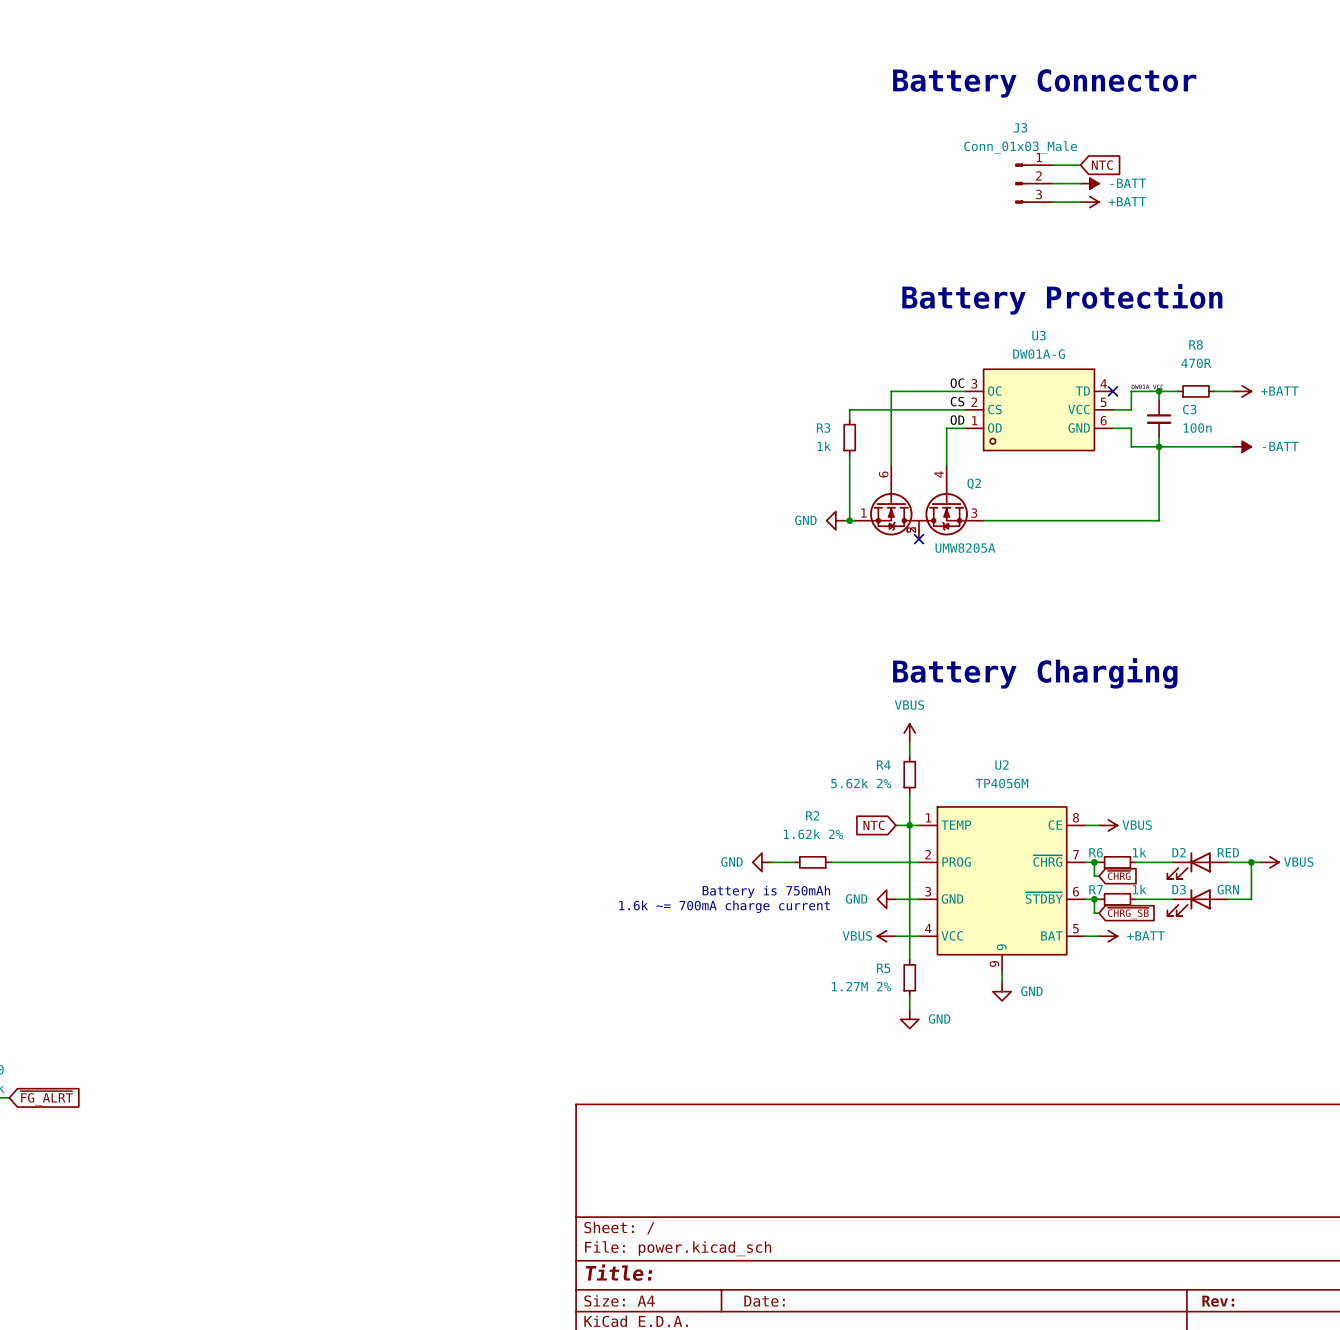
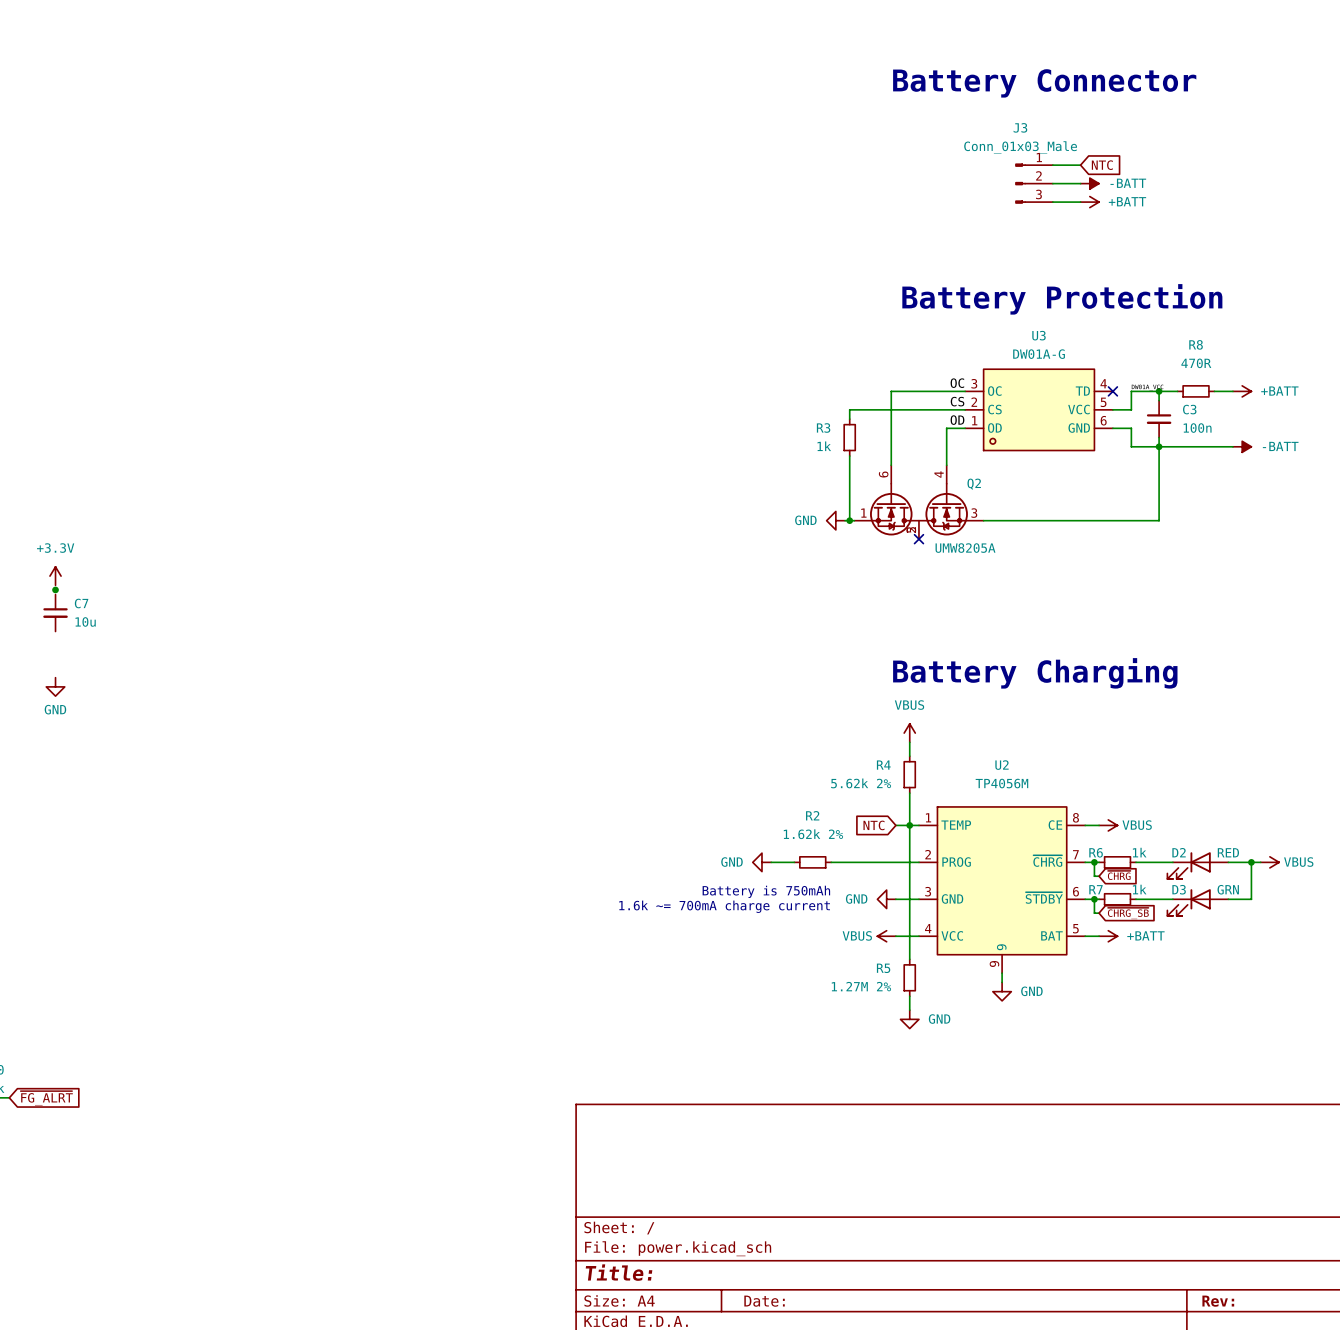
power symbol: none -> +3.3V (55, 576)
junction: none -> (55, 589)
C7: none -> 10u (55, 613)
power symbol: none -> GND (55, 686)

